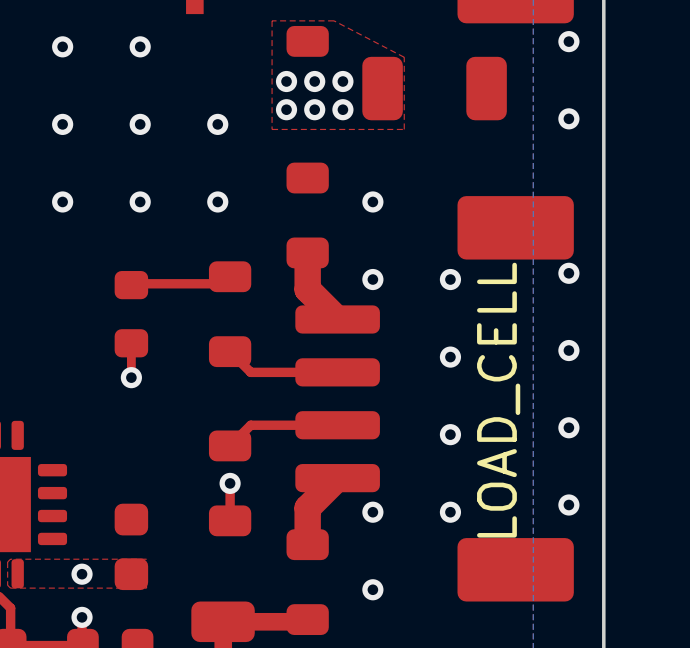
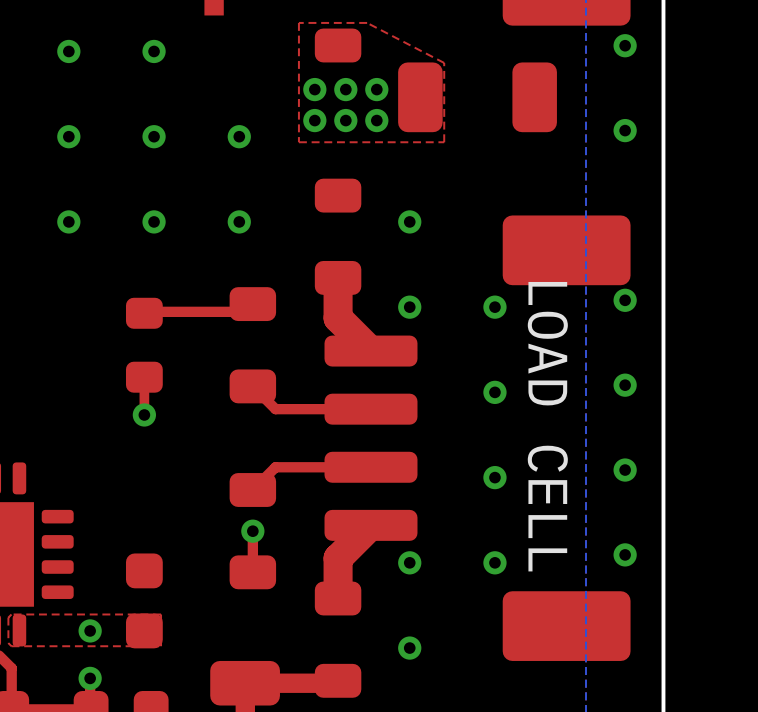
text: LOAD_CELL (498, 400) -> LOAD CELL (547, 426)

